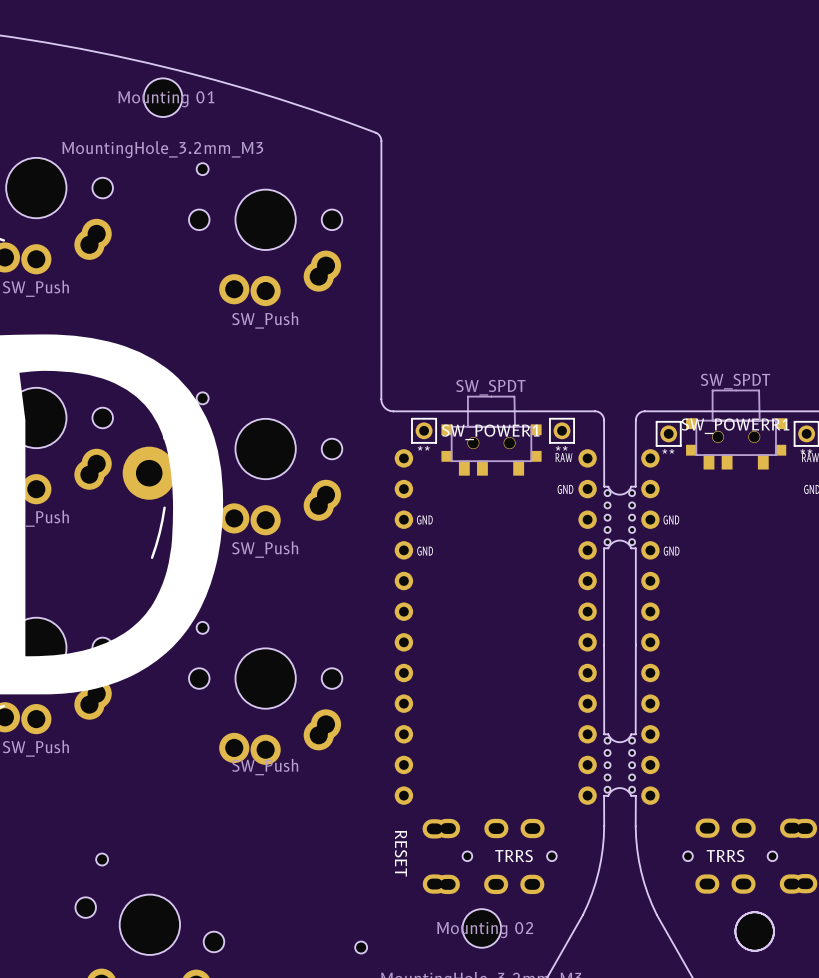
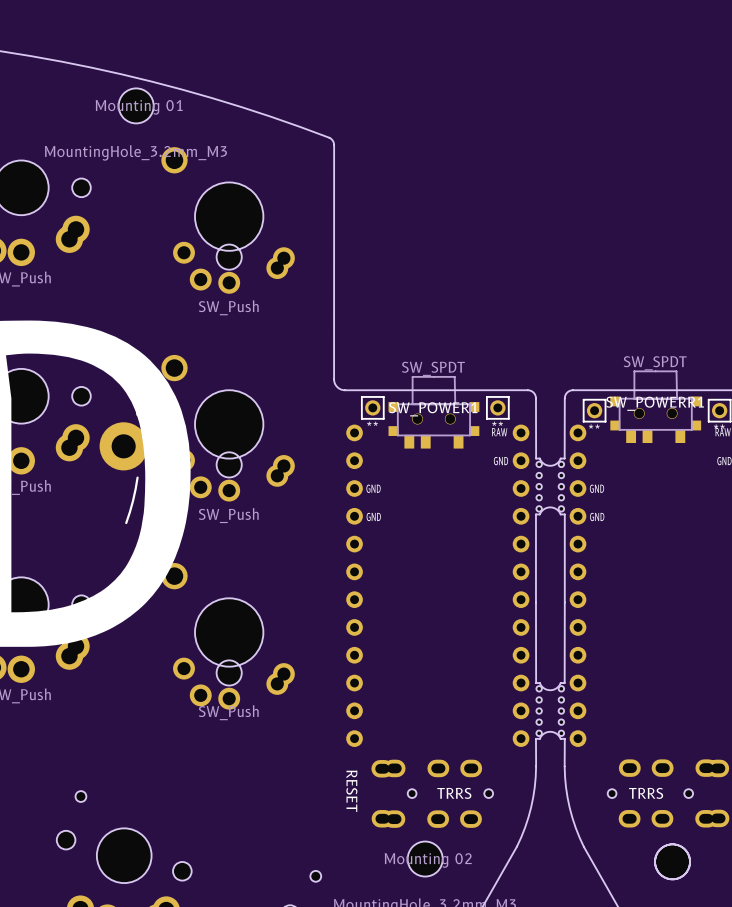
part footprint: [188, 163, 343, 307] -> [161, 147, 295, 294]
part footprint: [188, 392, 343, 536] -> [161, 354, 295, 502]
part footprint: [188, 621, 343, 765] -> [161, 563, 295, 710]

